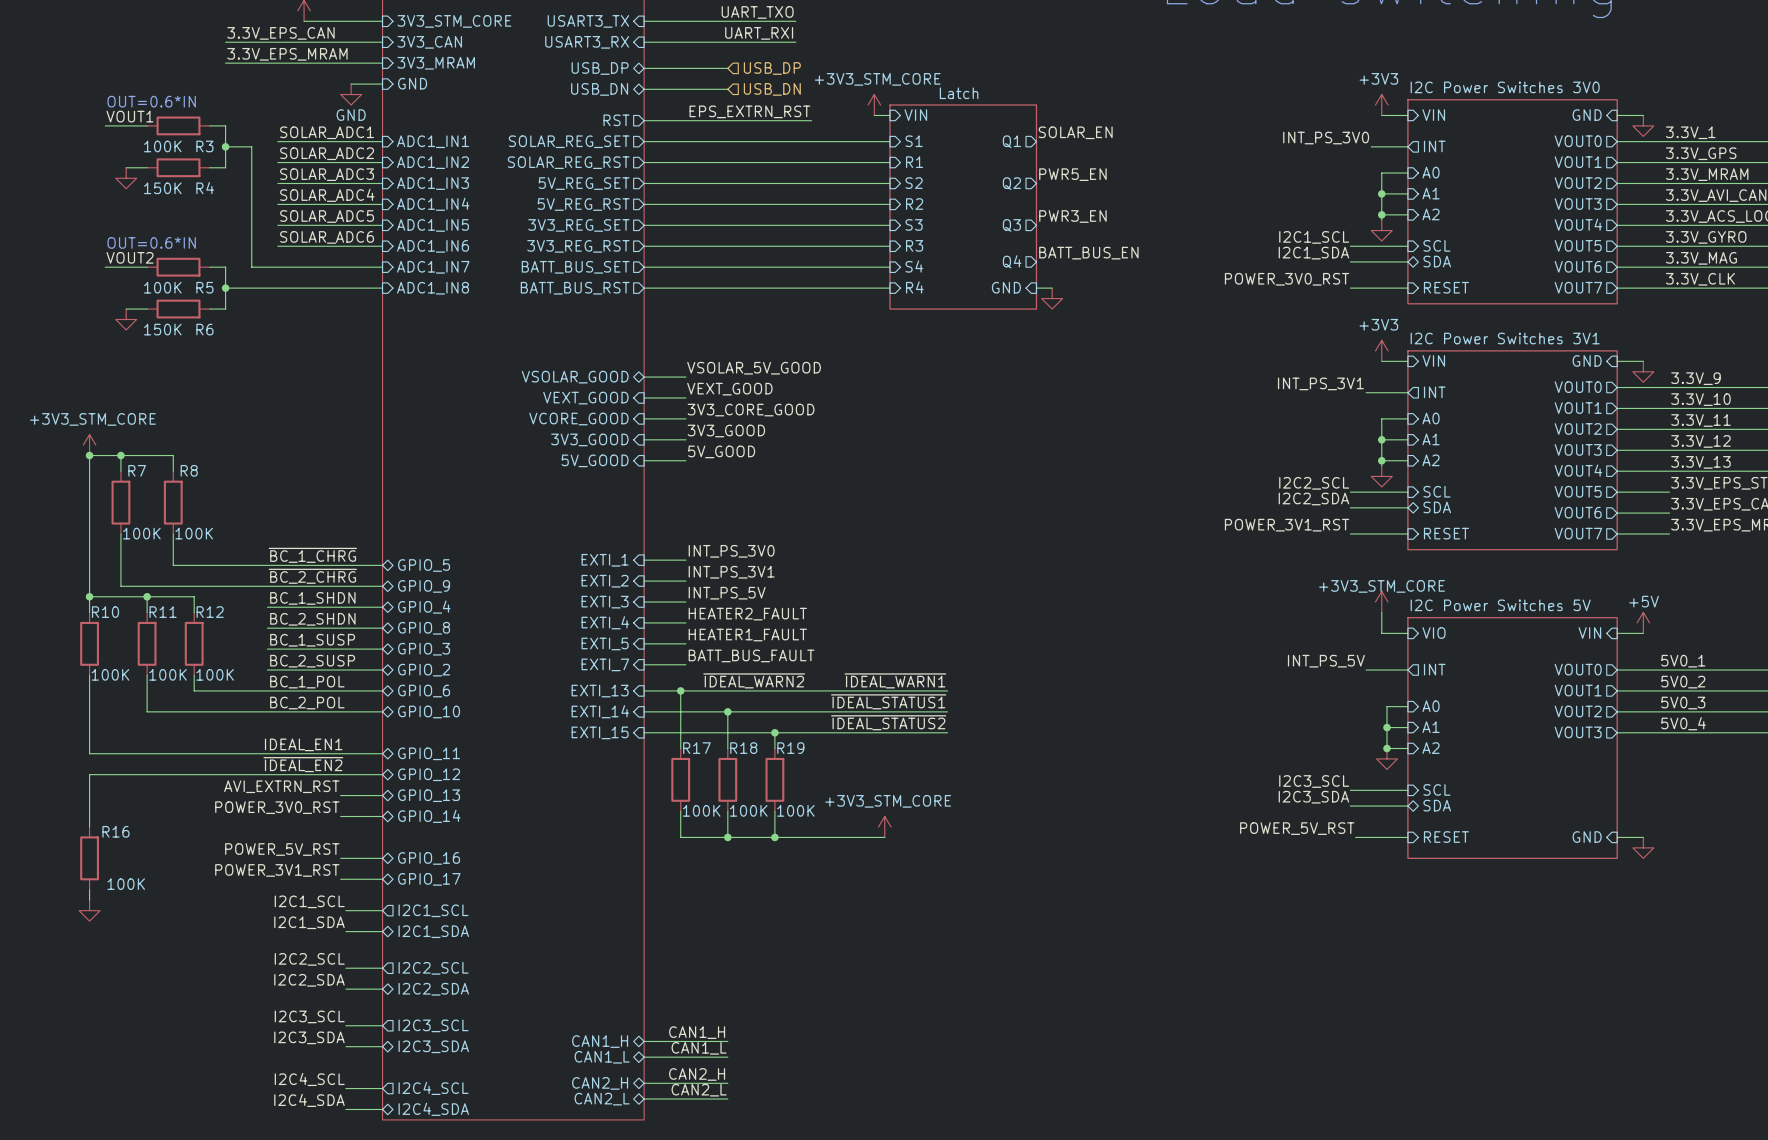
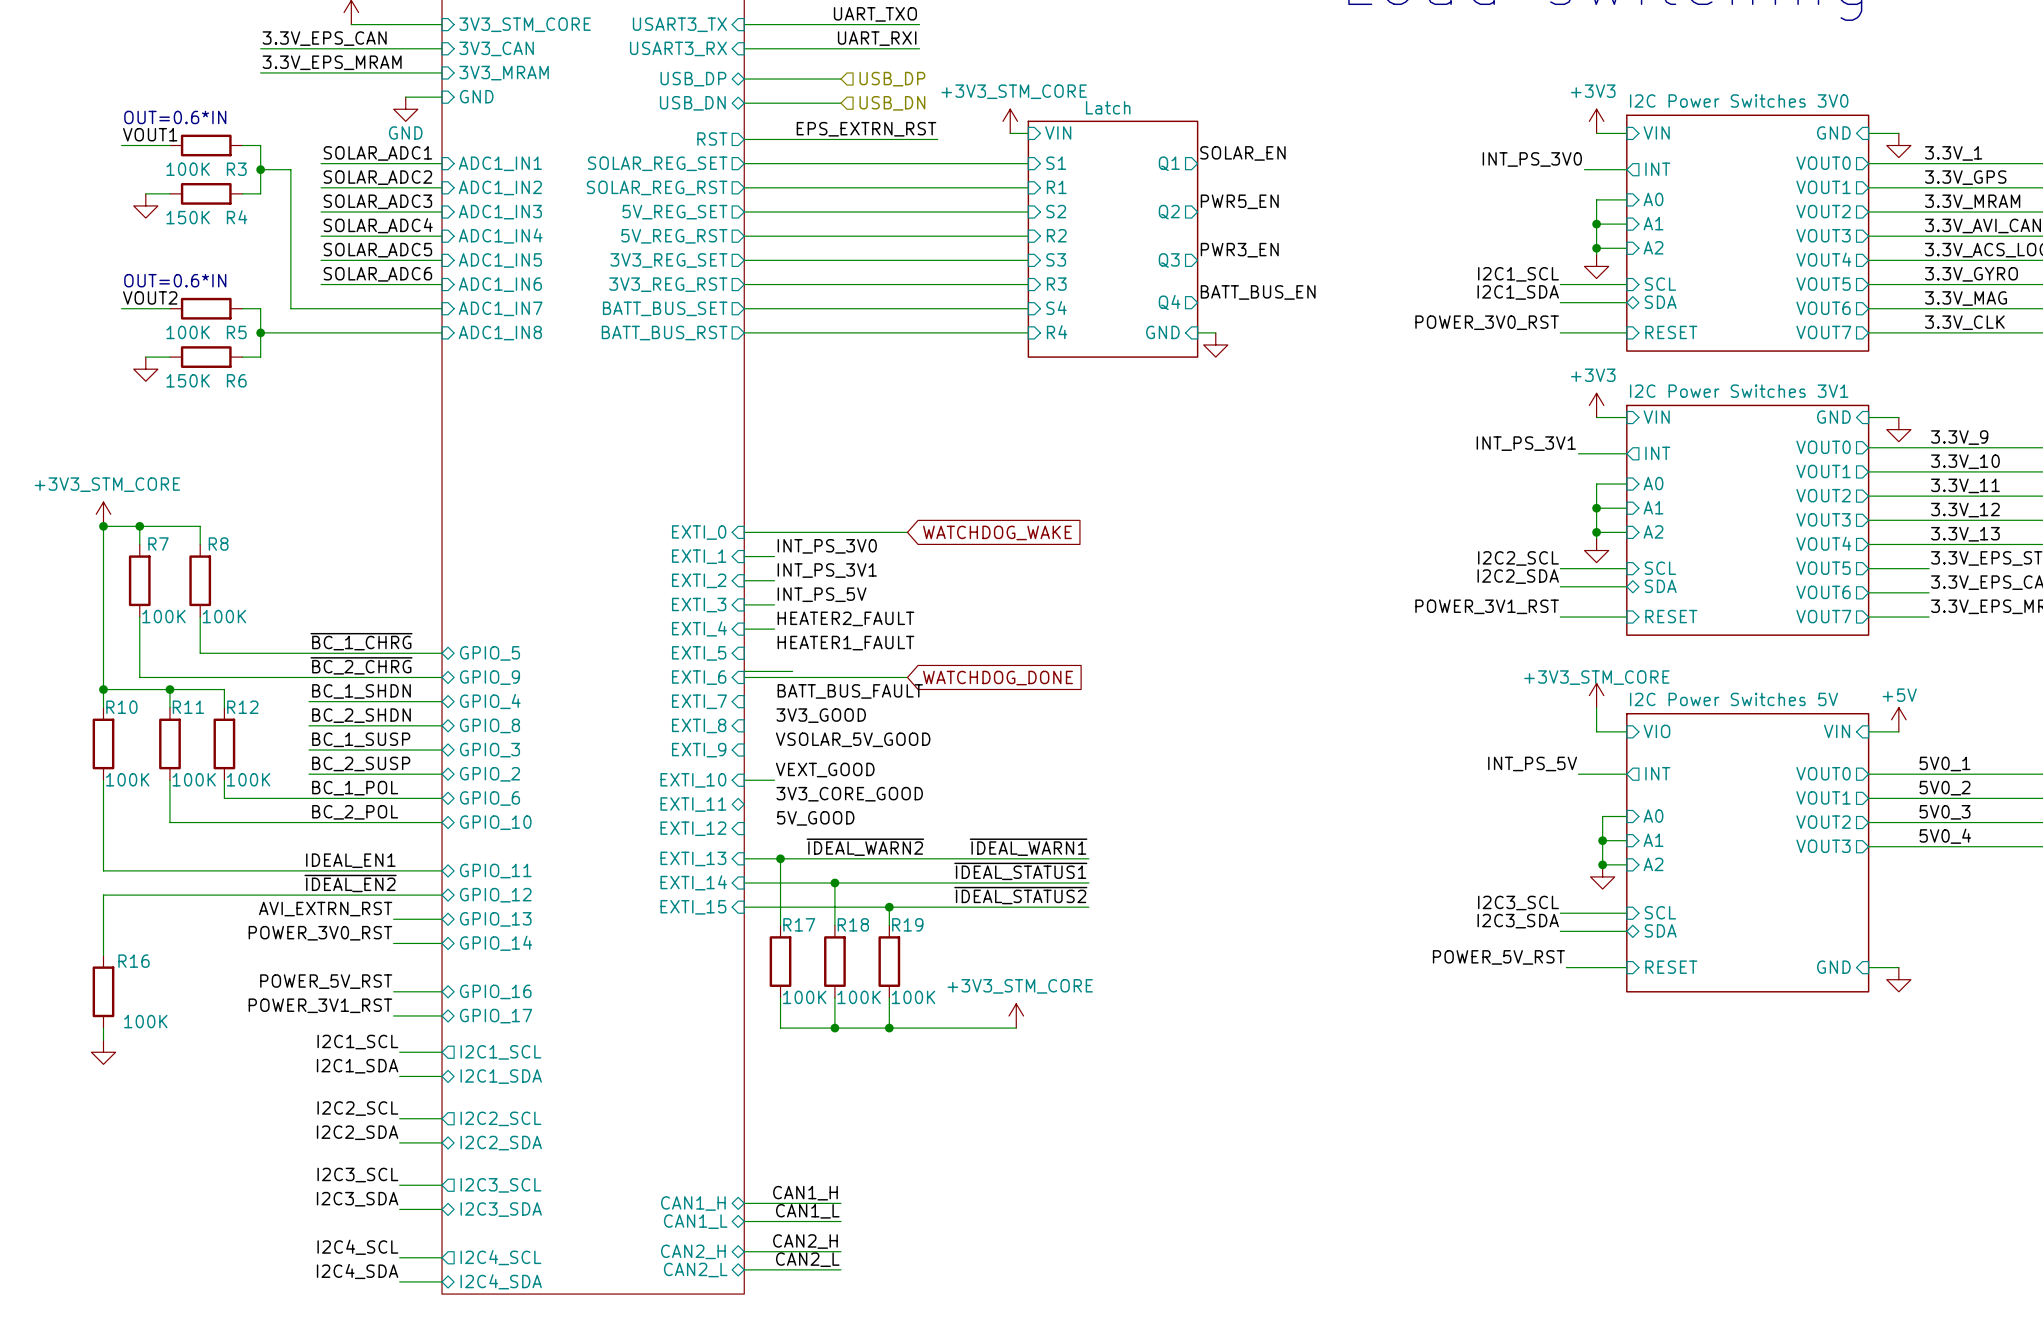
label: VSOLAR_5V_GOOD (754, 368) -> none
sheet pin: VSOLAR_GOOD (575, 377) -> none
wire: (644, 377) (685, 377) -> none
label: VEXT_GOOD (729, 389) -> none
wire: (644, 397) (685, 397) -> none
sheet pin: VEXT_GOOD (585, 398) -> none
label: 3V3_CORE_GOOD (751, 410) -> none
wire: (644, 418) (685, 418) -> none
sheet pin: VCORE_GOOD (578, 419) -> none
label position: 3V3_GOOD (726, 430) -> 3V3_GOOD (821, 715)
sheet pin: 3V3_GOOD (589, 439) -> none
wire: (644, 439) (685, 439) -> none
label: 5V_GOOD (721, 451) -> none
sheet pin: 5V_GOOD (595, 460) -> EXTI_0 (699, 532)
wire: none -> (792, 532) (907, 532)
global label: none -> WATCHDOG_WAKE (997, 532)
wire: none -> (744, 556) (774, 556)
wire: none -> (744, 580) (774, 580)
wire: none -> (744, 604) (774, 604)
wire: none -> (744, 629) (774, 629)
label position: INT_PS_3V0 (731, 551) -> INT_PS_3V0 (827, 546)
sheet pin position: EXTI_1 (605, 560) -> EXTI_1 (699, 556)
wire: (644, 560) (685, 560) -> none
label position: INT_PS_3V1 (731, 572) -> INT_PS_3V1 (827, 570)
sheet pin position: EXTI_2 (605, 581) -> EXTI_2 (699, 580)
sheet pin: none -> EXTI_6 (699, 677)
wire: none -> (744, 677) (907, 677)
global label: none -> WATCHDOG_DONE (998, 678)
label position: INT_PS_5V (727, 593) -> INT_PS_5V (822, 594)
sheet pin position: EXTI_3 (605, 602) -> EXTI_3 (699, 605)
wire: (644, 602) (685, 602) -> none
label position: HEATER2_FAULT (747, 614) -> HEATER2_FAULT (845, 618)
sheet pin position: EXTI_4 (605, 622) -> EXTI_4 (699, 628)
wire: (644, 622) (685, 622) -> none
sheet pin: none -> EXTI_8 (699, 725)
label position: HEATER1_FAULT (747, 635) -> HEATER1_FAULT (845, 643)
label: none -> VSOLAR_5V_GOOD (853, 739)
sheet pin position: EXTI_5 (605, 643) -> EXTI_5 (699, 653)
wire: (644, 643) (685, 643) -> none
sheet pin: none -> EXTI_9 (699, 750)
label position: BATT_BUS_FAULT (751, 655) -> BATT_BUS_FAULT (850, 691)
sheet pin position: EXTI_7 (605, 664) -> EXTI_7 (699, 701)
wire: (644, 664) (685, 664) -> none
label: none -> VEXT_GOOD (825, 770)
sheet pin: none -> EXTI_10 (693, 780)
wire: none -> (744, 780) (774, 780)
label position: ~{IDEAL_WARN2} (754, 680) -> ~{IDEAL_WARN2} (865, 847)
label position: ~{IDEAL_WARN1} (895, 680) -> ~{IDEAL_WARN1} (1028, 847)
label: none -> 3V3_CORE_GOOD (849, 794)
wire: (644, 690) (947, 690) -> none
wire: (680, 690) (680, 748) -> (780, 858) (780, 925)
junction: (680, 690) -> none
sheet pin position: EXTI_13 (600, 691) -> EXTI_13 (693, 858)
sheet pin: none -> EXTI_11 (693, 804)
label position: ~{IDEAL_STATUS1} (888, 701) -> ~{IDEAL_STATUS1} (1020, 871)
label: none -> 5V_GOOD (815, 818)
sheet pin position: EXTI_14 (600, 711) -> EXTI_14 (693, 882)
wire: (644, 711) (947, 711) -> none
wire: (727, 711) (727, 748) -> (834, 882) (834, 925)
junction: (727, 711) -> none
sheet pin: none -> EXTI_12 (693, 828)
label position: ~{IDEAL_STATUS2} (888, 722) -> ~{IDEAL_STATUS2} (1020, 895)
sheet pin position: EXTI_15 (600, 732) -> EXTI_15 (693, 907)
wire: (644, 732) (947, 732) -> none
wire: (774, 732) (774, 748) -> (889, 907) (889, 925)
junction: (774, 732) -> none
wire: none -> (744, 858) (1088, 858)
junction: none -> (780, 858)
wire: none -> (744, 882) (1088, 882)
junction: none -> (834, 882)
R17 position: (680, 779) -> (780, 961)
R18 position: (727, 779) -> (834, 961)
R19 position: (774, 779) -> (889, 961)
wire: none -> (744, 907) (1088, 907)
junction: none -> (889, 907)
wire: (680, 811) (680, 837) (884, 837) -> (780, 997) (780, 1028) (1016, 1028)
wire: (727, 811) (727, 837) -> (834, 997) (834, 1028)
wire: (774, 811) (774, 837) -> (889, 997) (889, 1028)
power symbol position: +3V3_STM_CORE (884, 826) -> +3V3_STM_CORE (1016, 1015)
junction: (727, 837) -> none
junction: (774, 837) -> none
junction: none -> (834, 1028)
junction: none -> (889, 1028)

